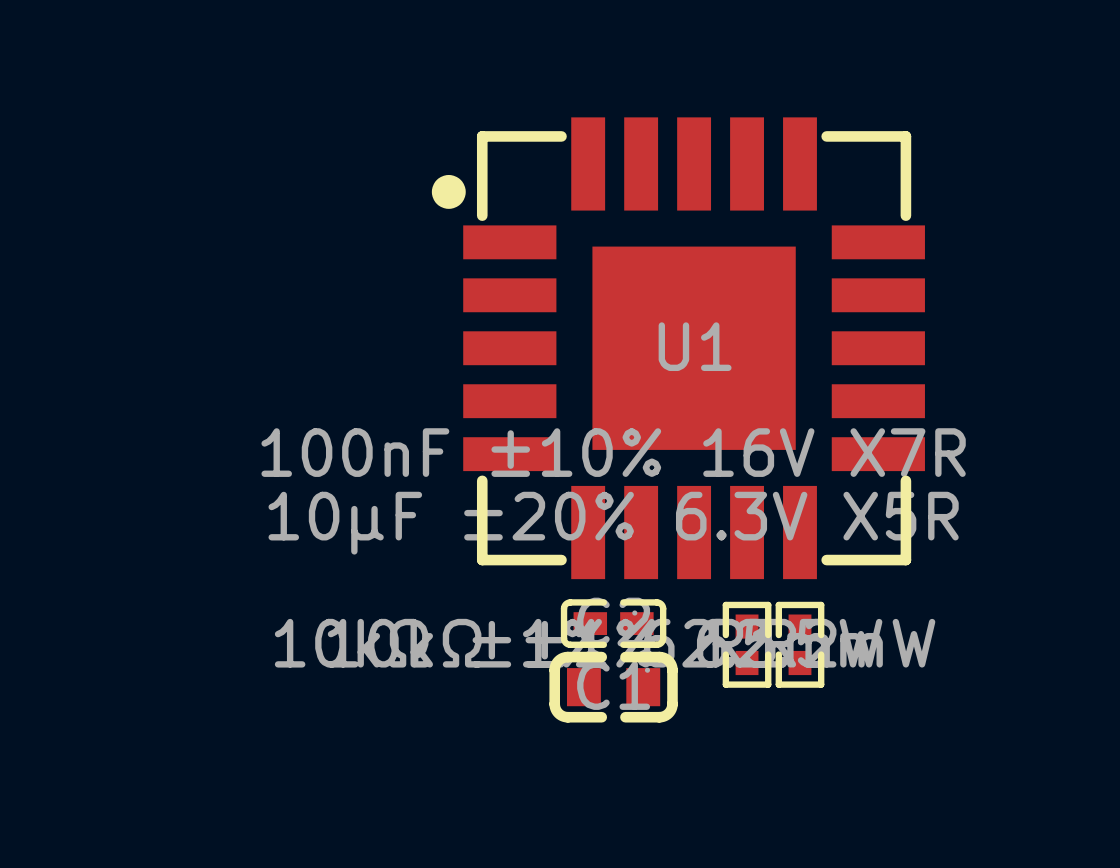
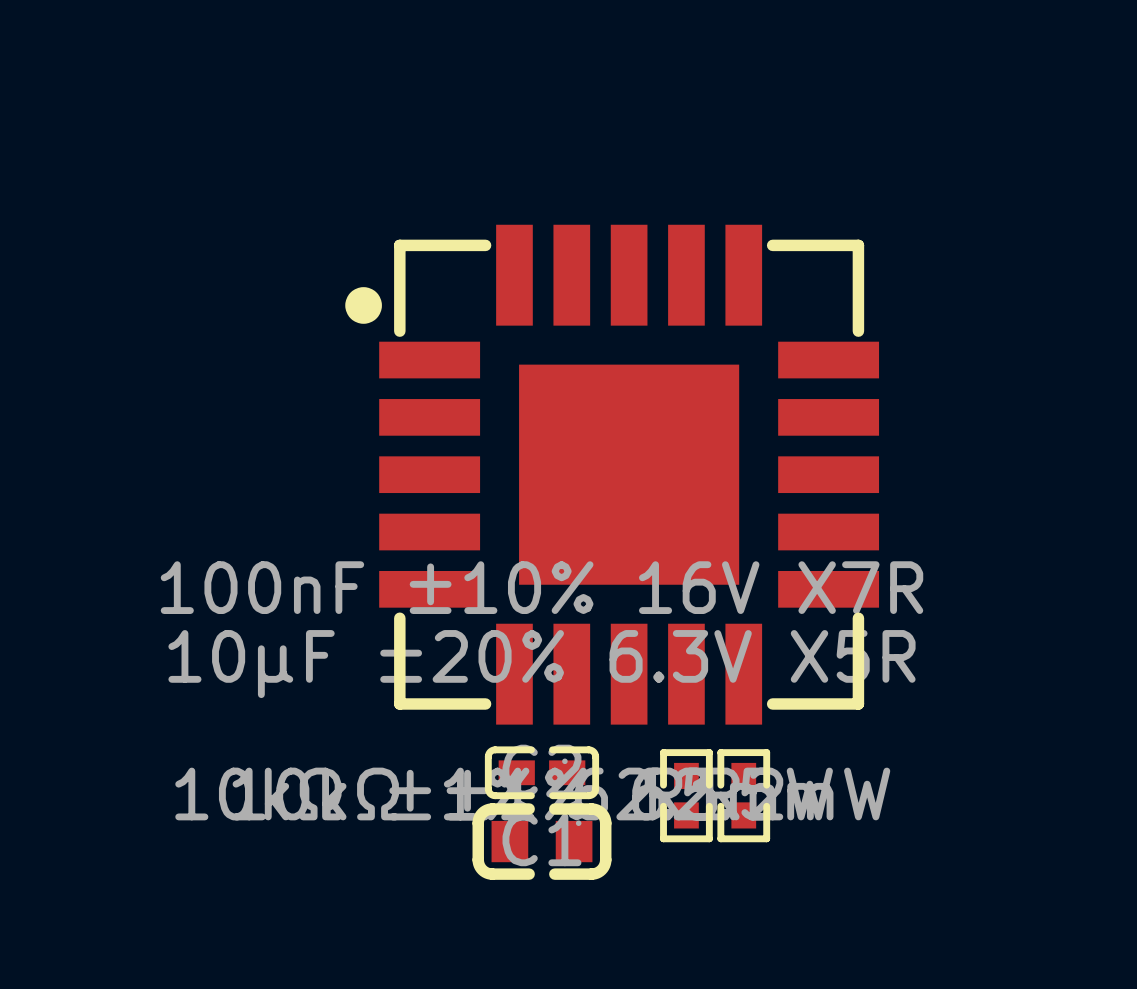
U1 name: U1 (695, 346) -> none

